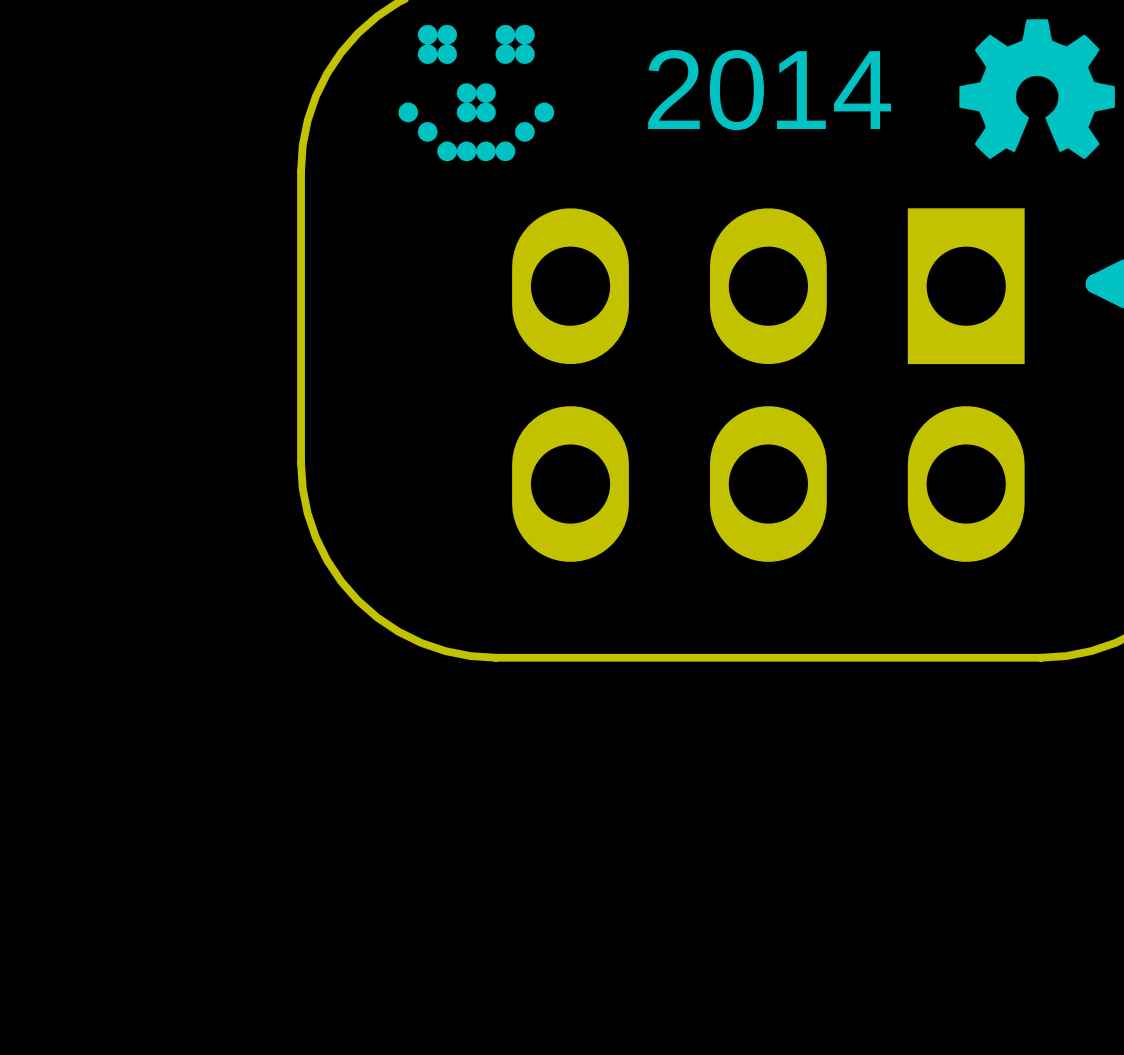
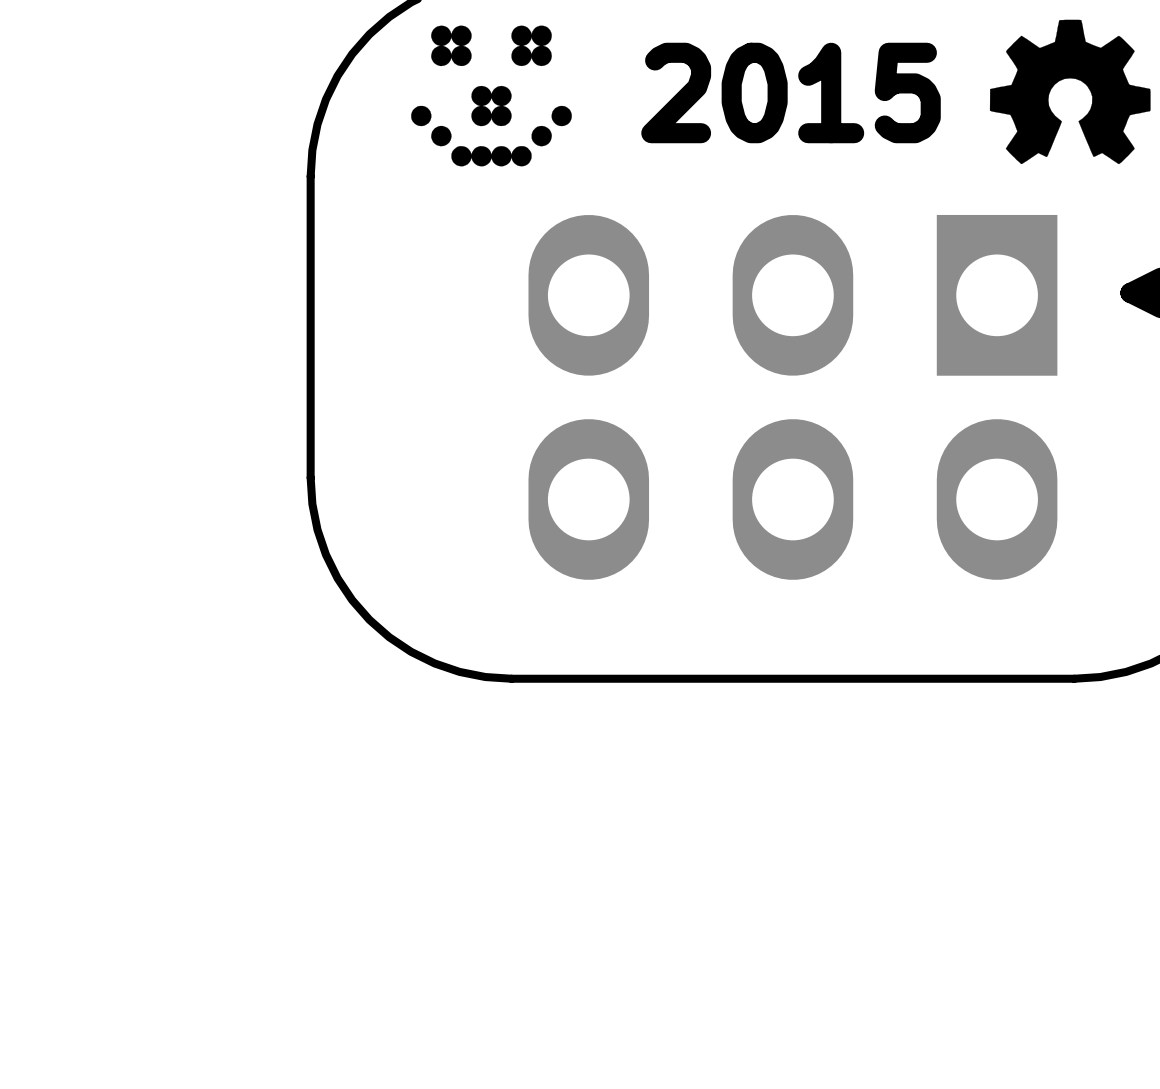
text: 2014 (769, 90) -> 2015 (791, 92)

